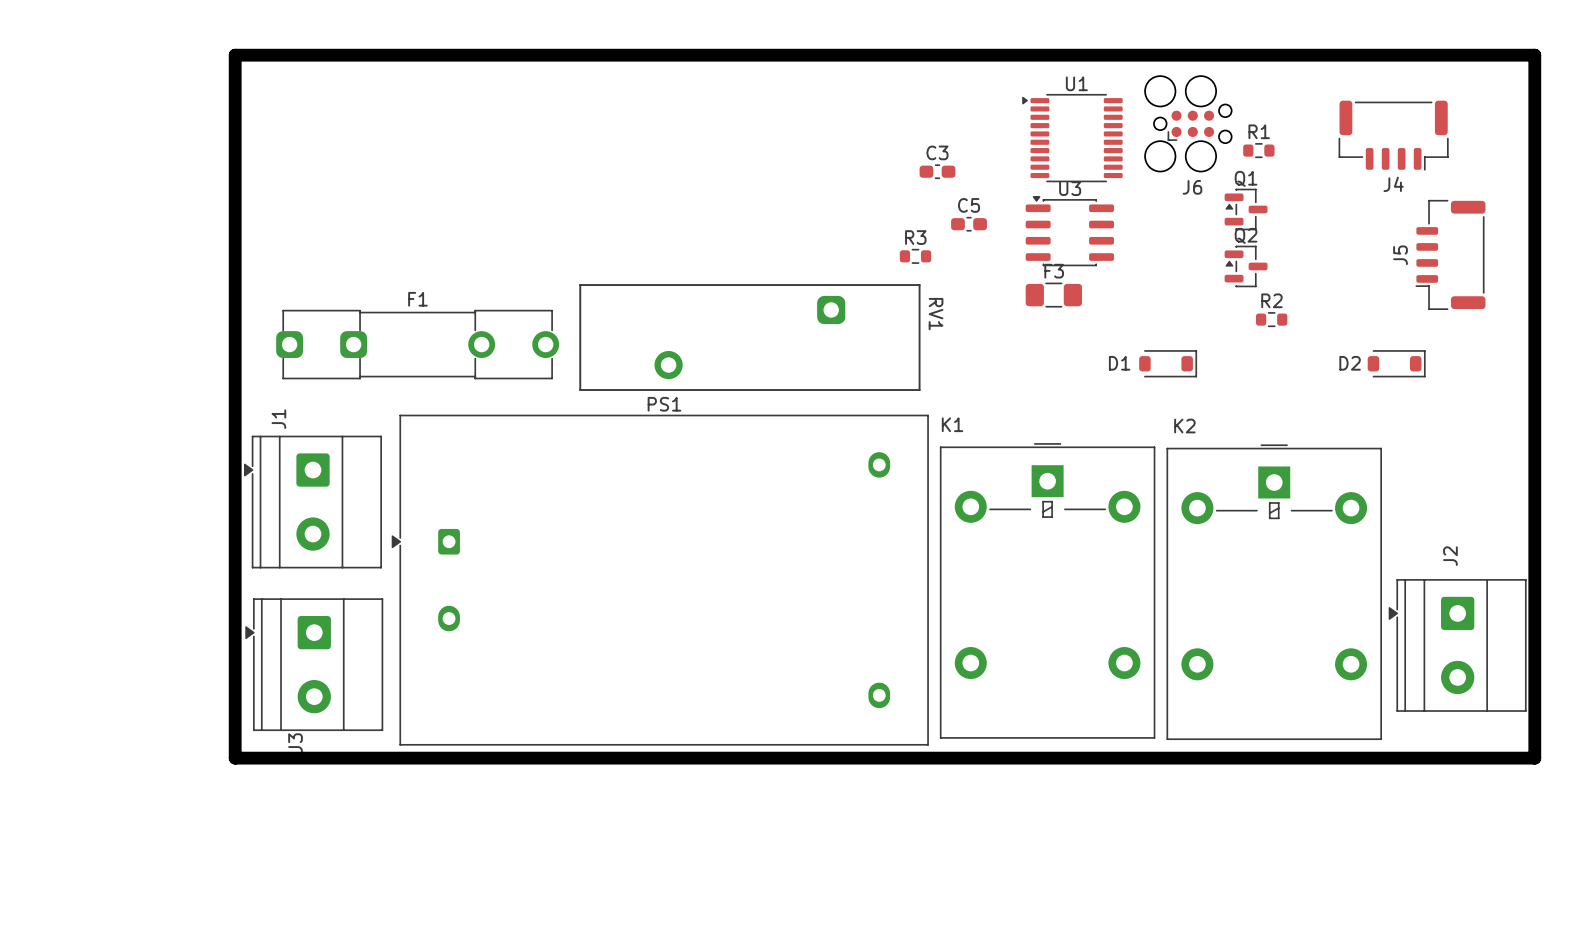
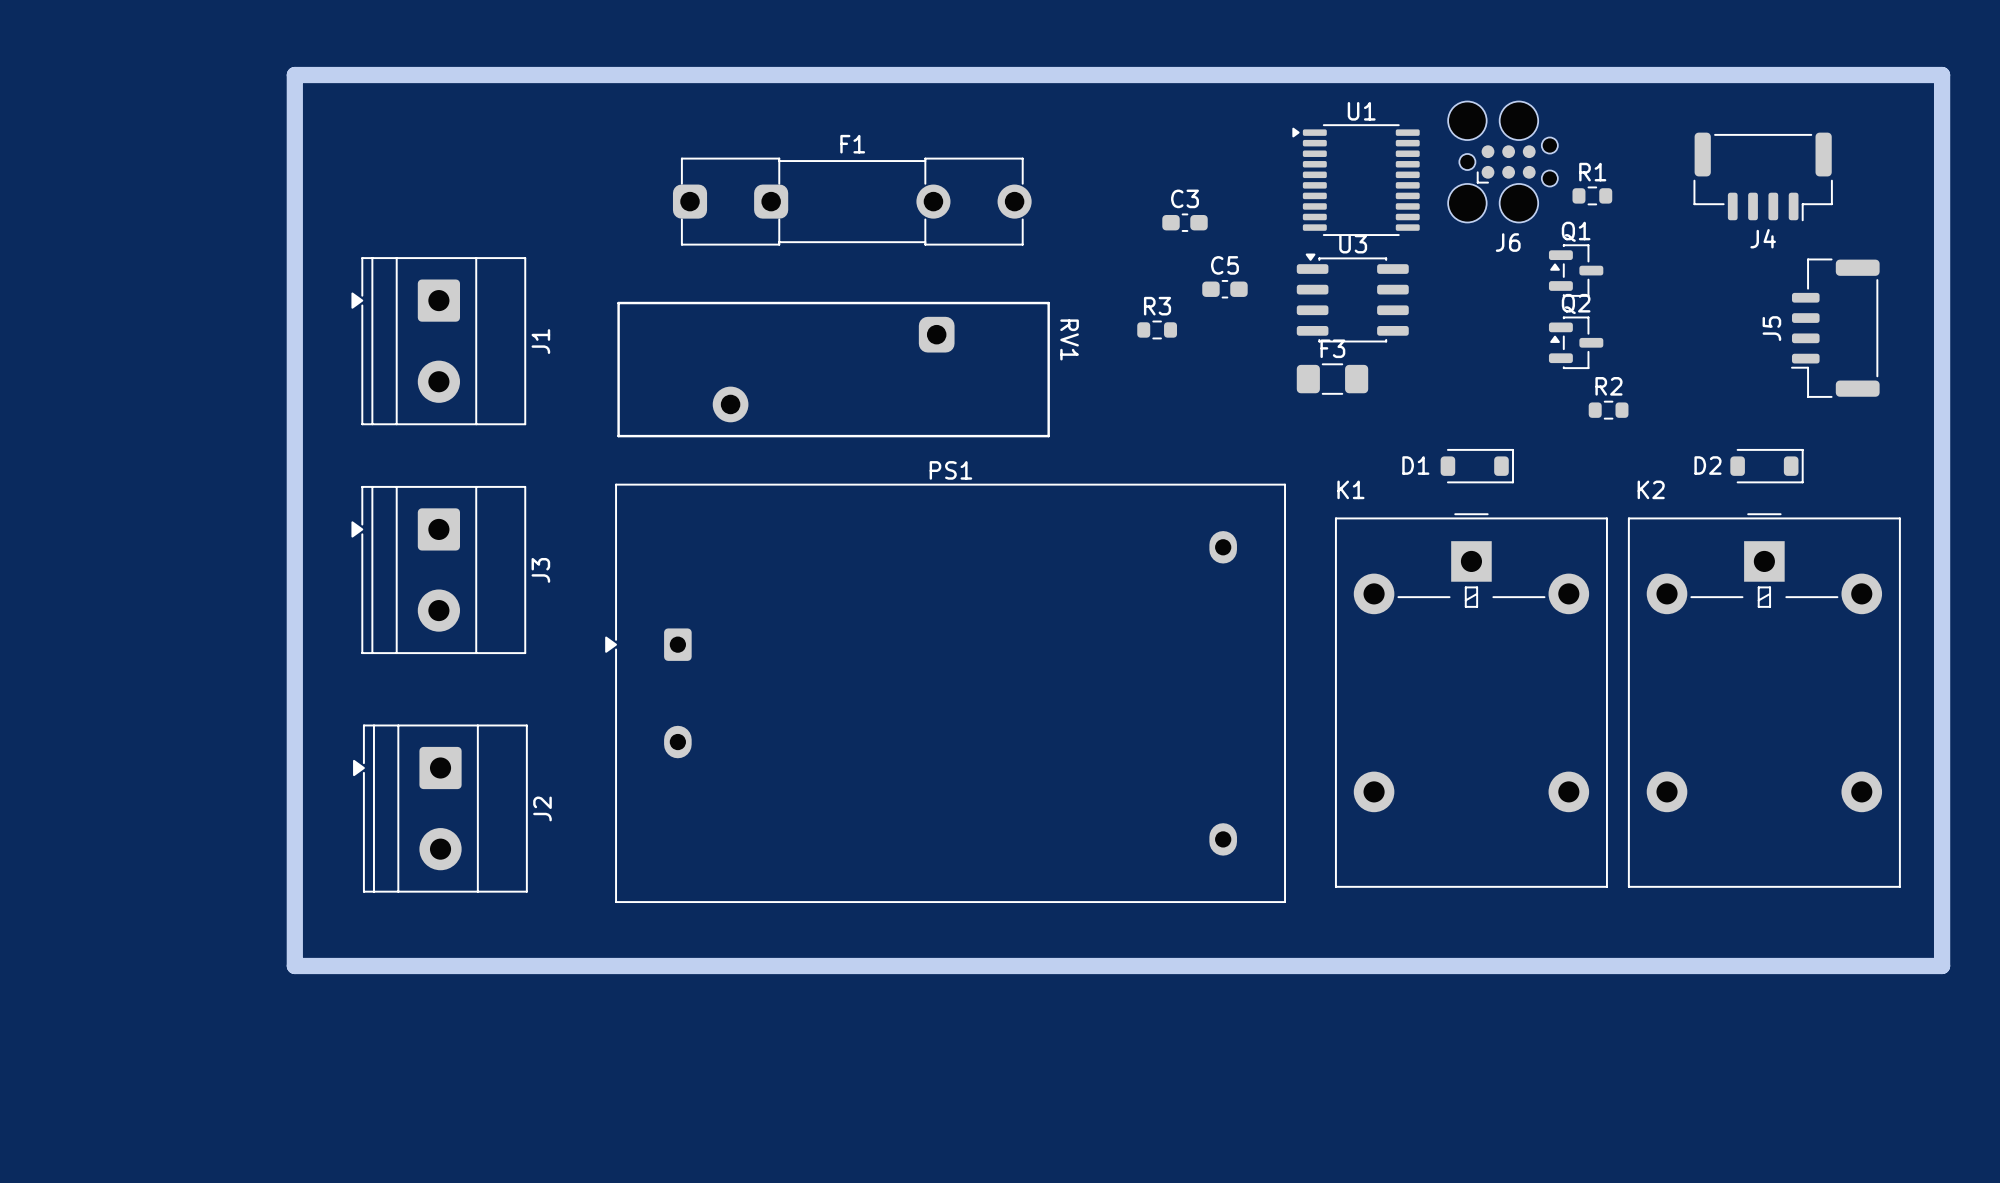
RV1 position: (749, 337) -> (833, 369)
F1 position: (417, 344) -> (852, 201)
J1 name position: J1 (278, 419) -> J1 (540, 341)
J1 position: (312, 502) -> (438, 341)
J2 name position: J2 (1450, 556) -> J2 (542, 808)
PS1 position: (660, 580) -> (945, 693)
K1 position: (1047, 590) -> (1471, 700)
K2 position: (1274, 592) -> (1764, 700)
J2 position: (1457, 645) -> (440, 808)
J3 position: (314, 664) -> (438, 570)
J3 name position: J3 (295, 743) -> J3 (540, 570)

